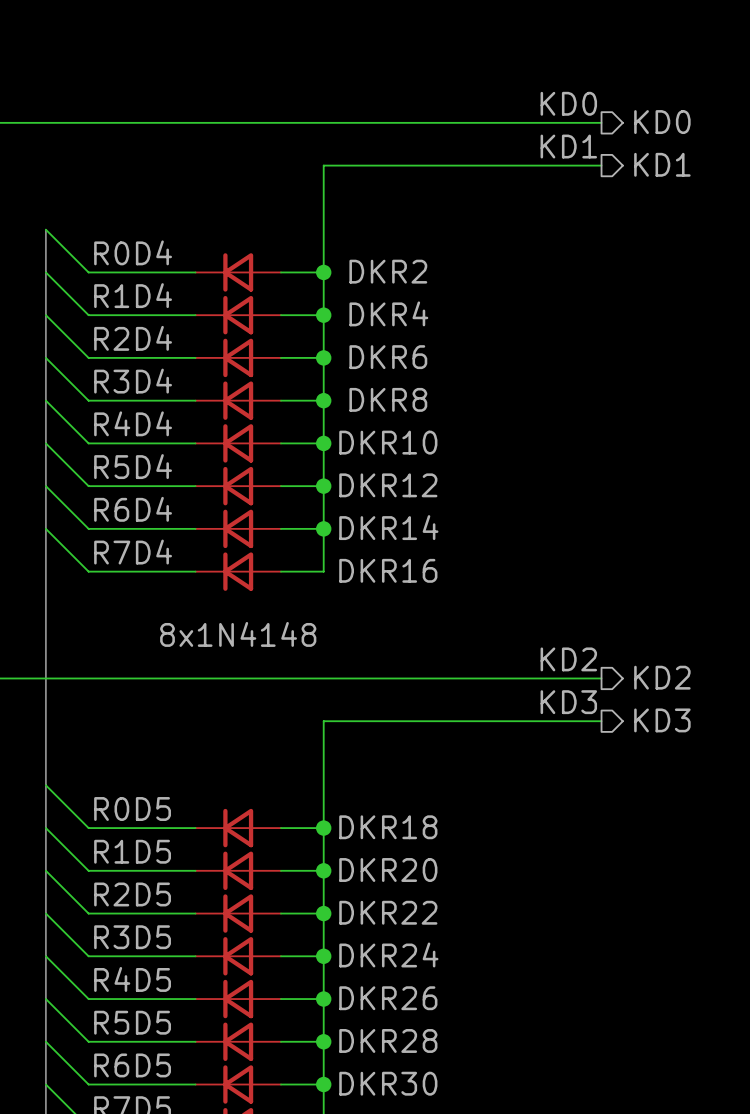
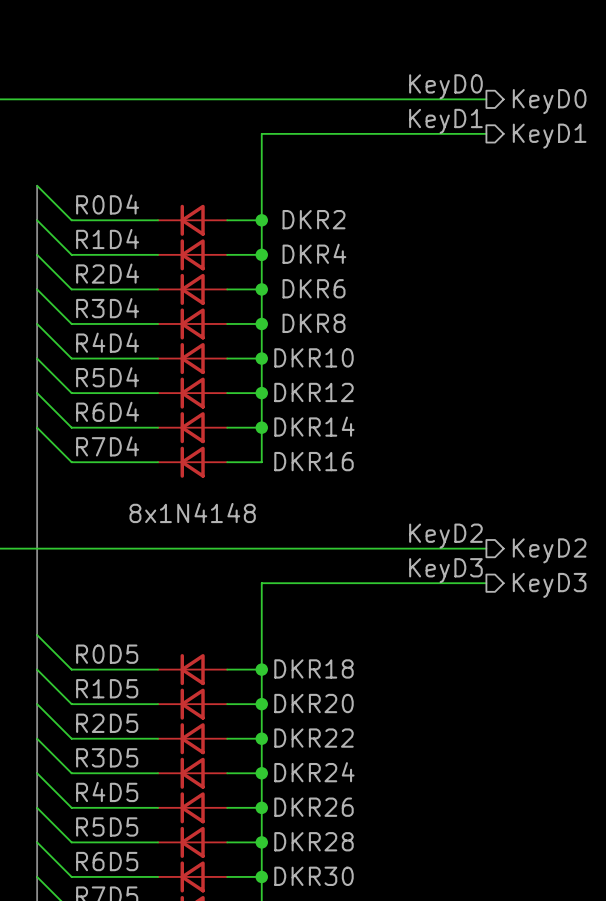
label: KD0 (568, 103) -> KeyD0 (445, 86)
hierarchical label: KD0 (662, 122) -> KeyD0 (549, 101)
label: KD1 (568, 146) -> KeyD1 (445, 121)
hierarchical label: KD1 (662, 164) -> KeyD1 (549, 136)
label: KD2 (568, 659) -> KeyD2 (445, 536)
hierarchical label: KD2 (662, 677) -> KeyD2 (549, 550)
label: KD3 (568, 702) -> KeyD3 (445, 570)
hierarchical label: KD3 (662, 720) -> KeyD3 (549, 585)

